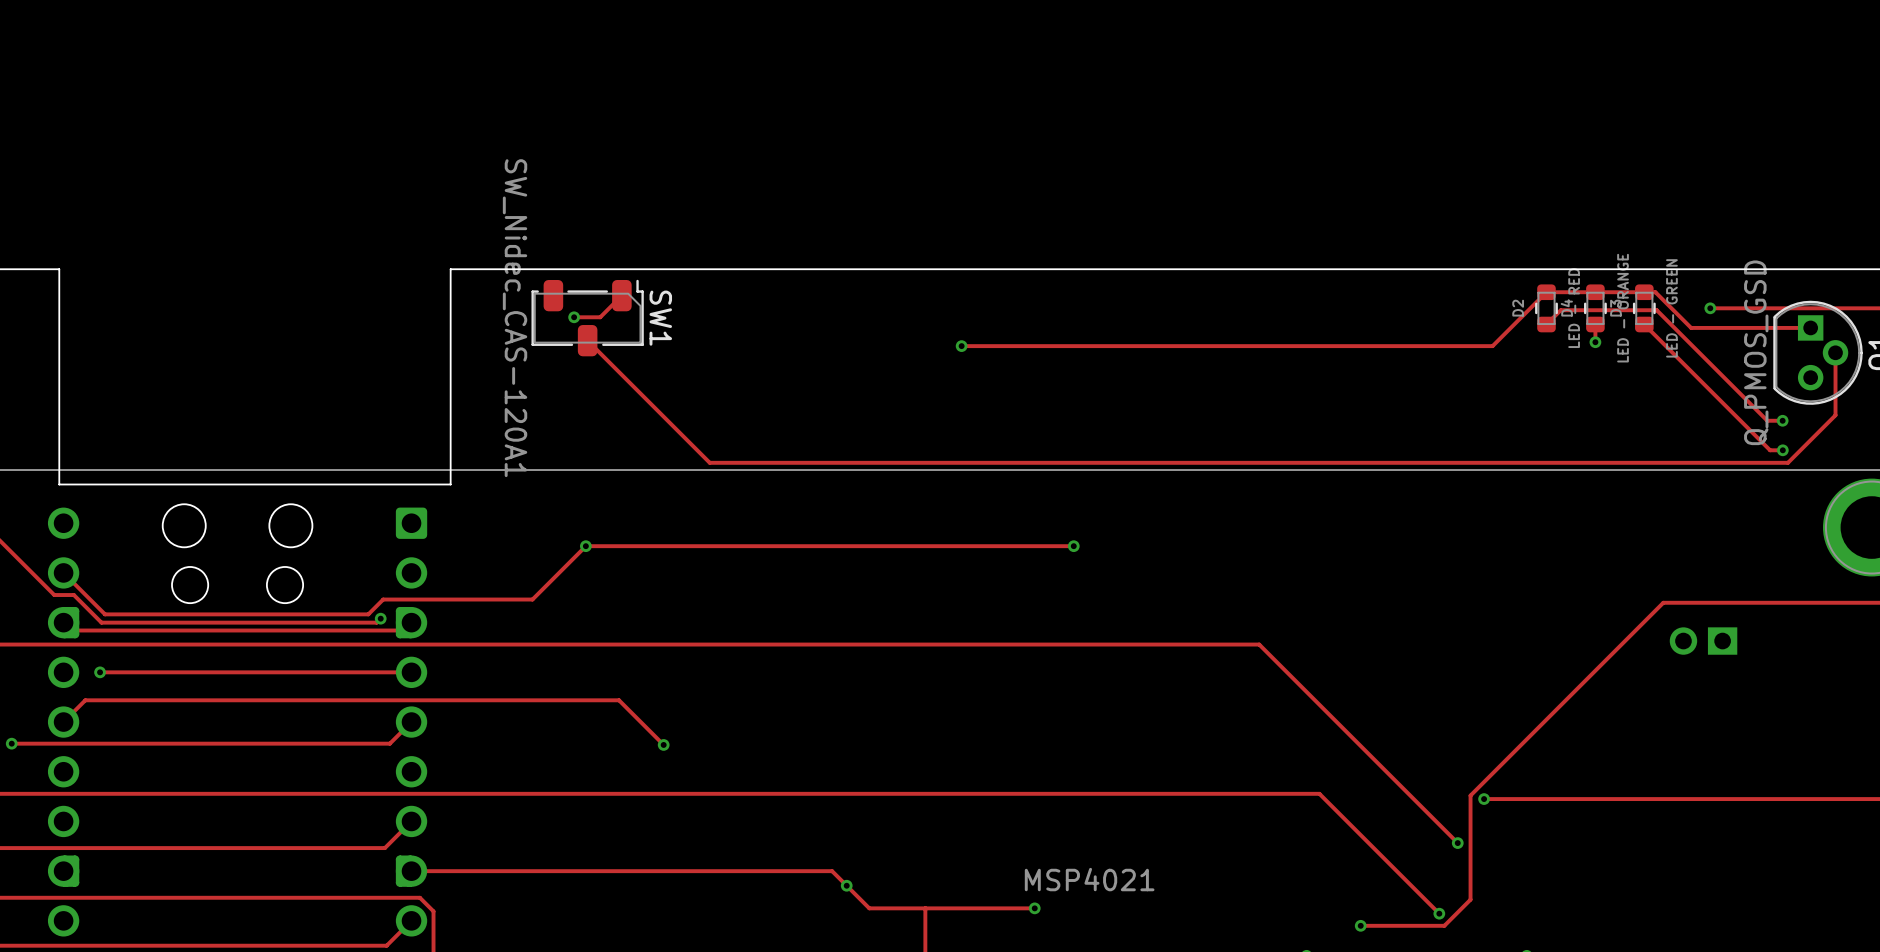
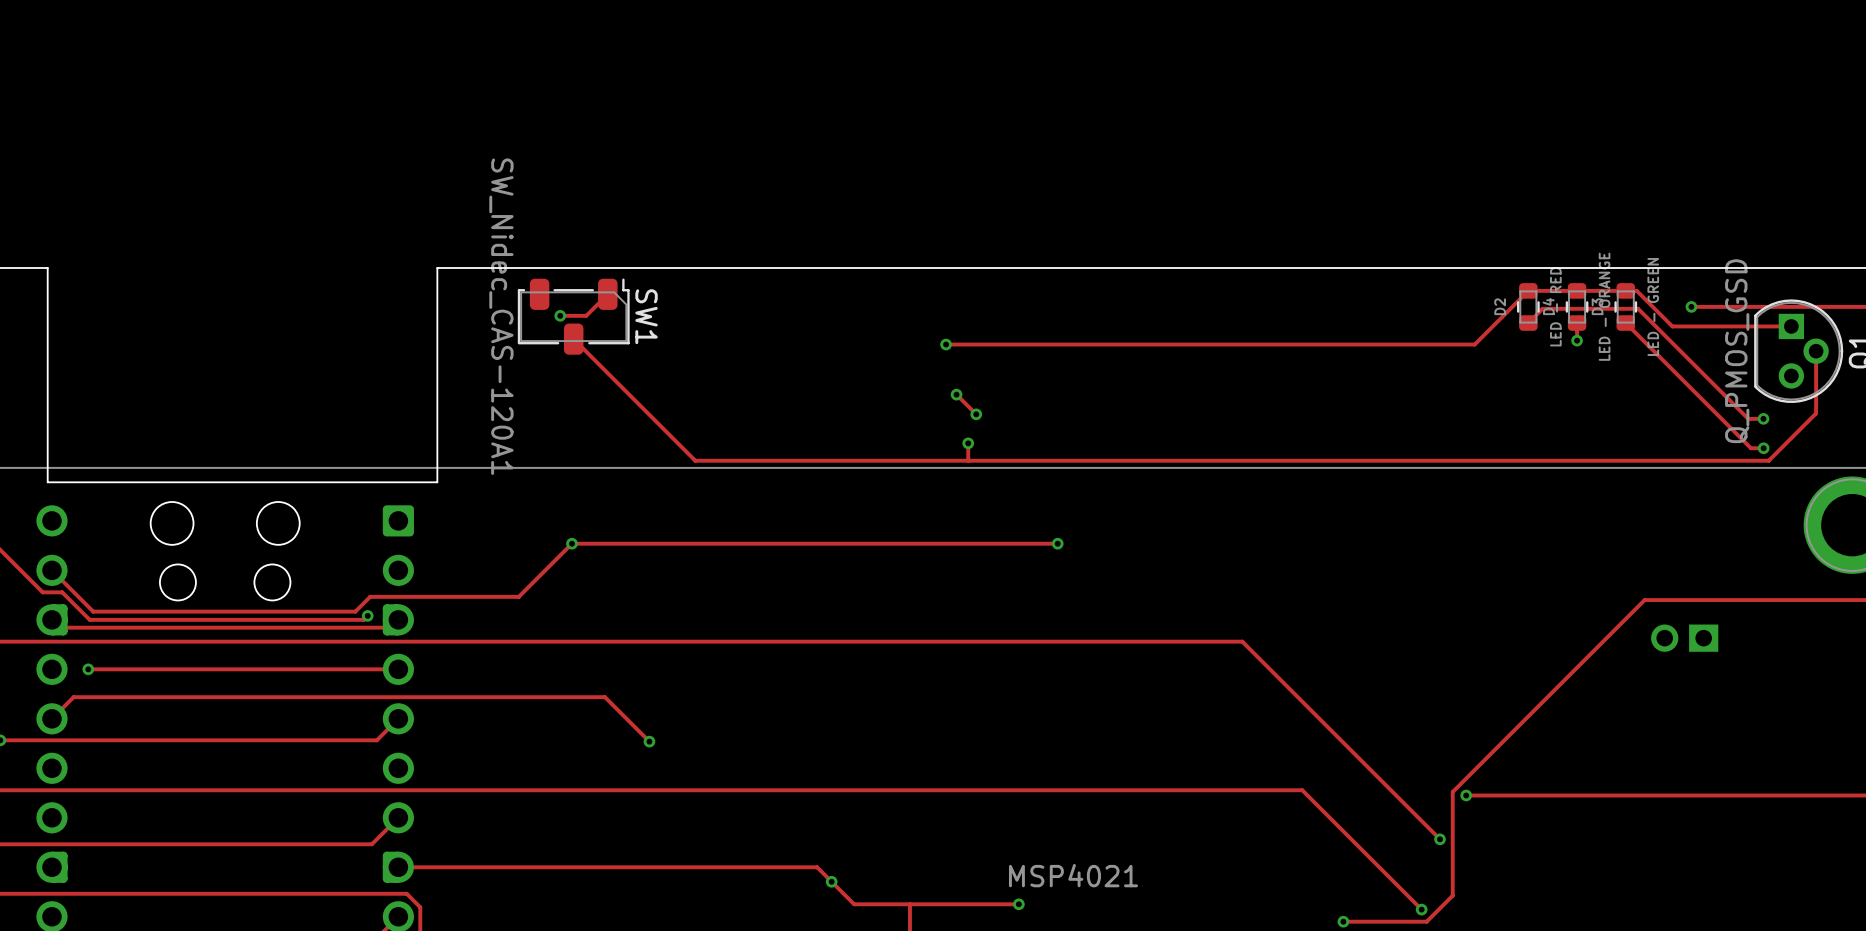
track: none -> (956, 394) (976, 414)
via: none -> (956, 394)
via: none -> (976, 414)
track: none -> (968, 443) (968, 460)
via: none -> (968, 443)

